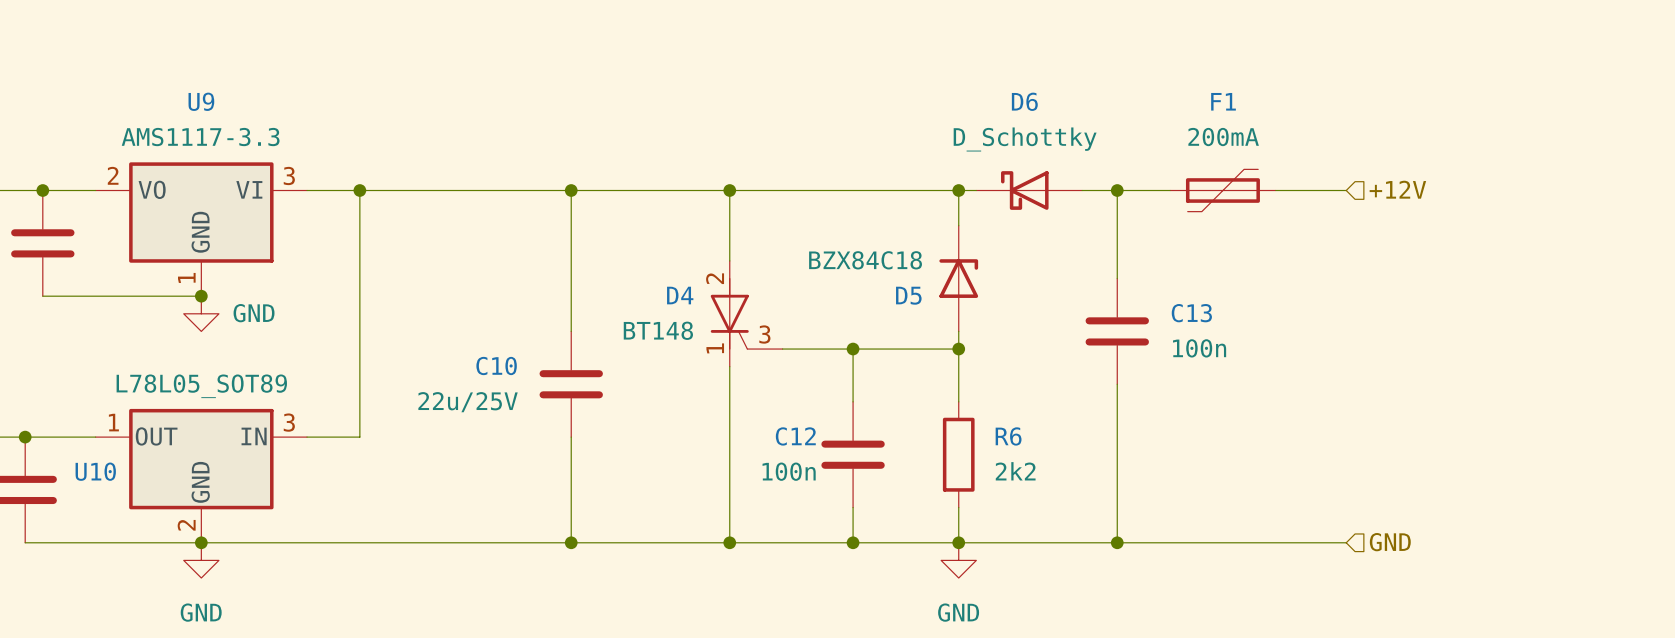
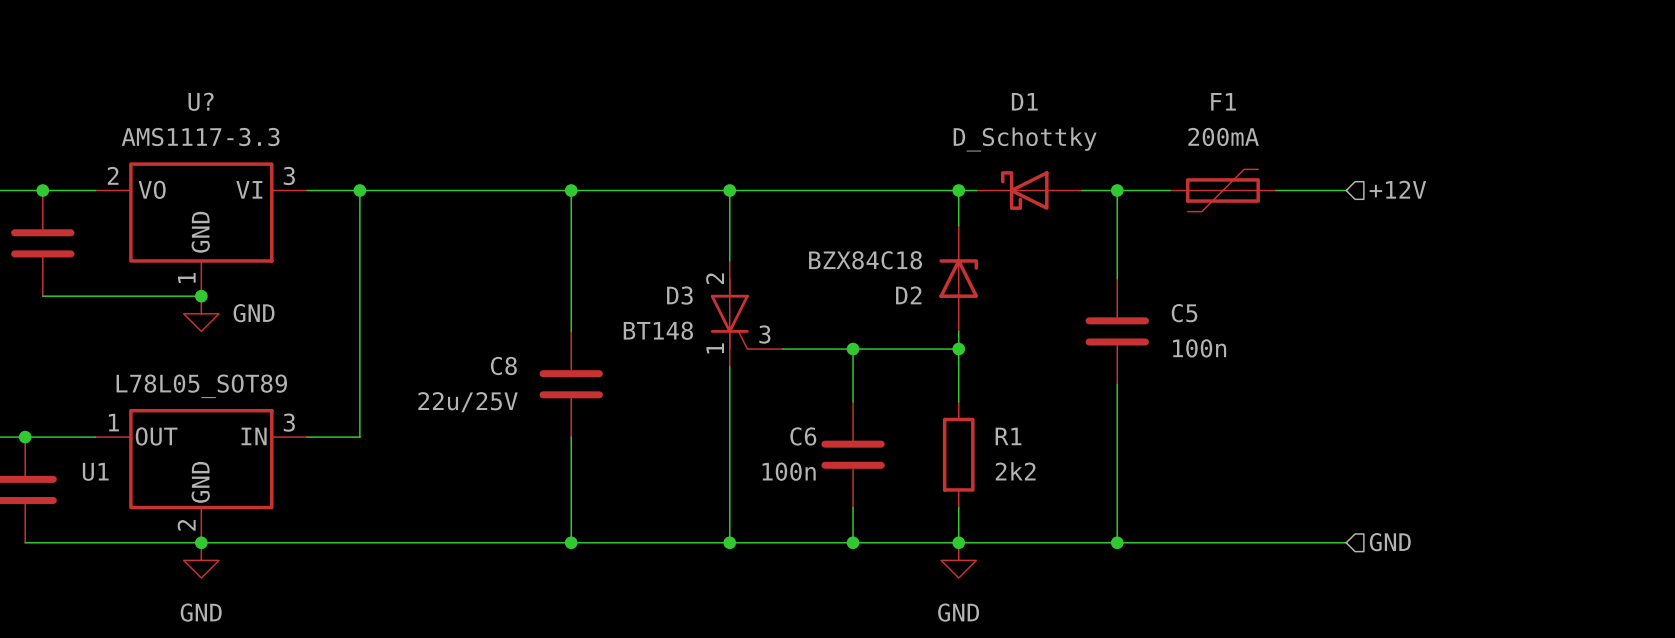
U9 name: U9 (201, 101) -> U? (201, 101)
D6 name: D6 (1024, 101) -> D1 (1024, 101)
D4 name: D4 (680, 295) -> D3 (679, 295)
D5 name: D5 (908, 295) -> D2 (908, 295)
C13 name: C13 (1191, 313) -> C5 (1184, 313)
C10 name: C10 (496, 366) -> C8 (503, 366)
C12 name: C12 (795, 436) -> C6 (803, 436)
R6 name: R6 (1008, 436) -> R1 (1008, 436)
U10 name: U10 (95, 471) -> U1 (95, 471)

